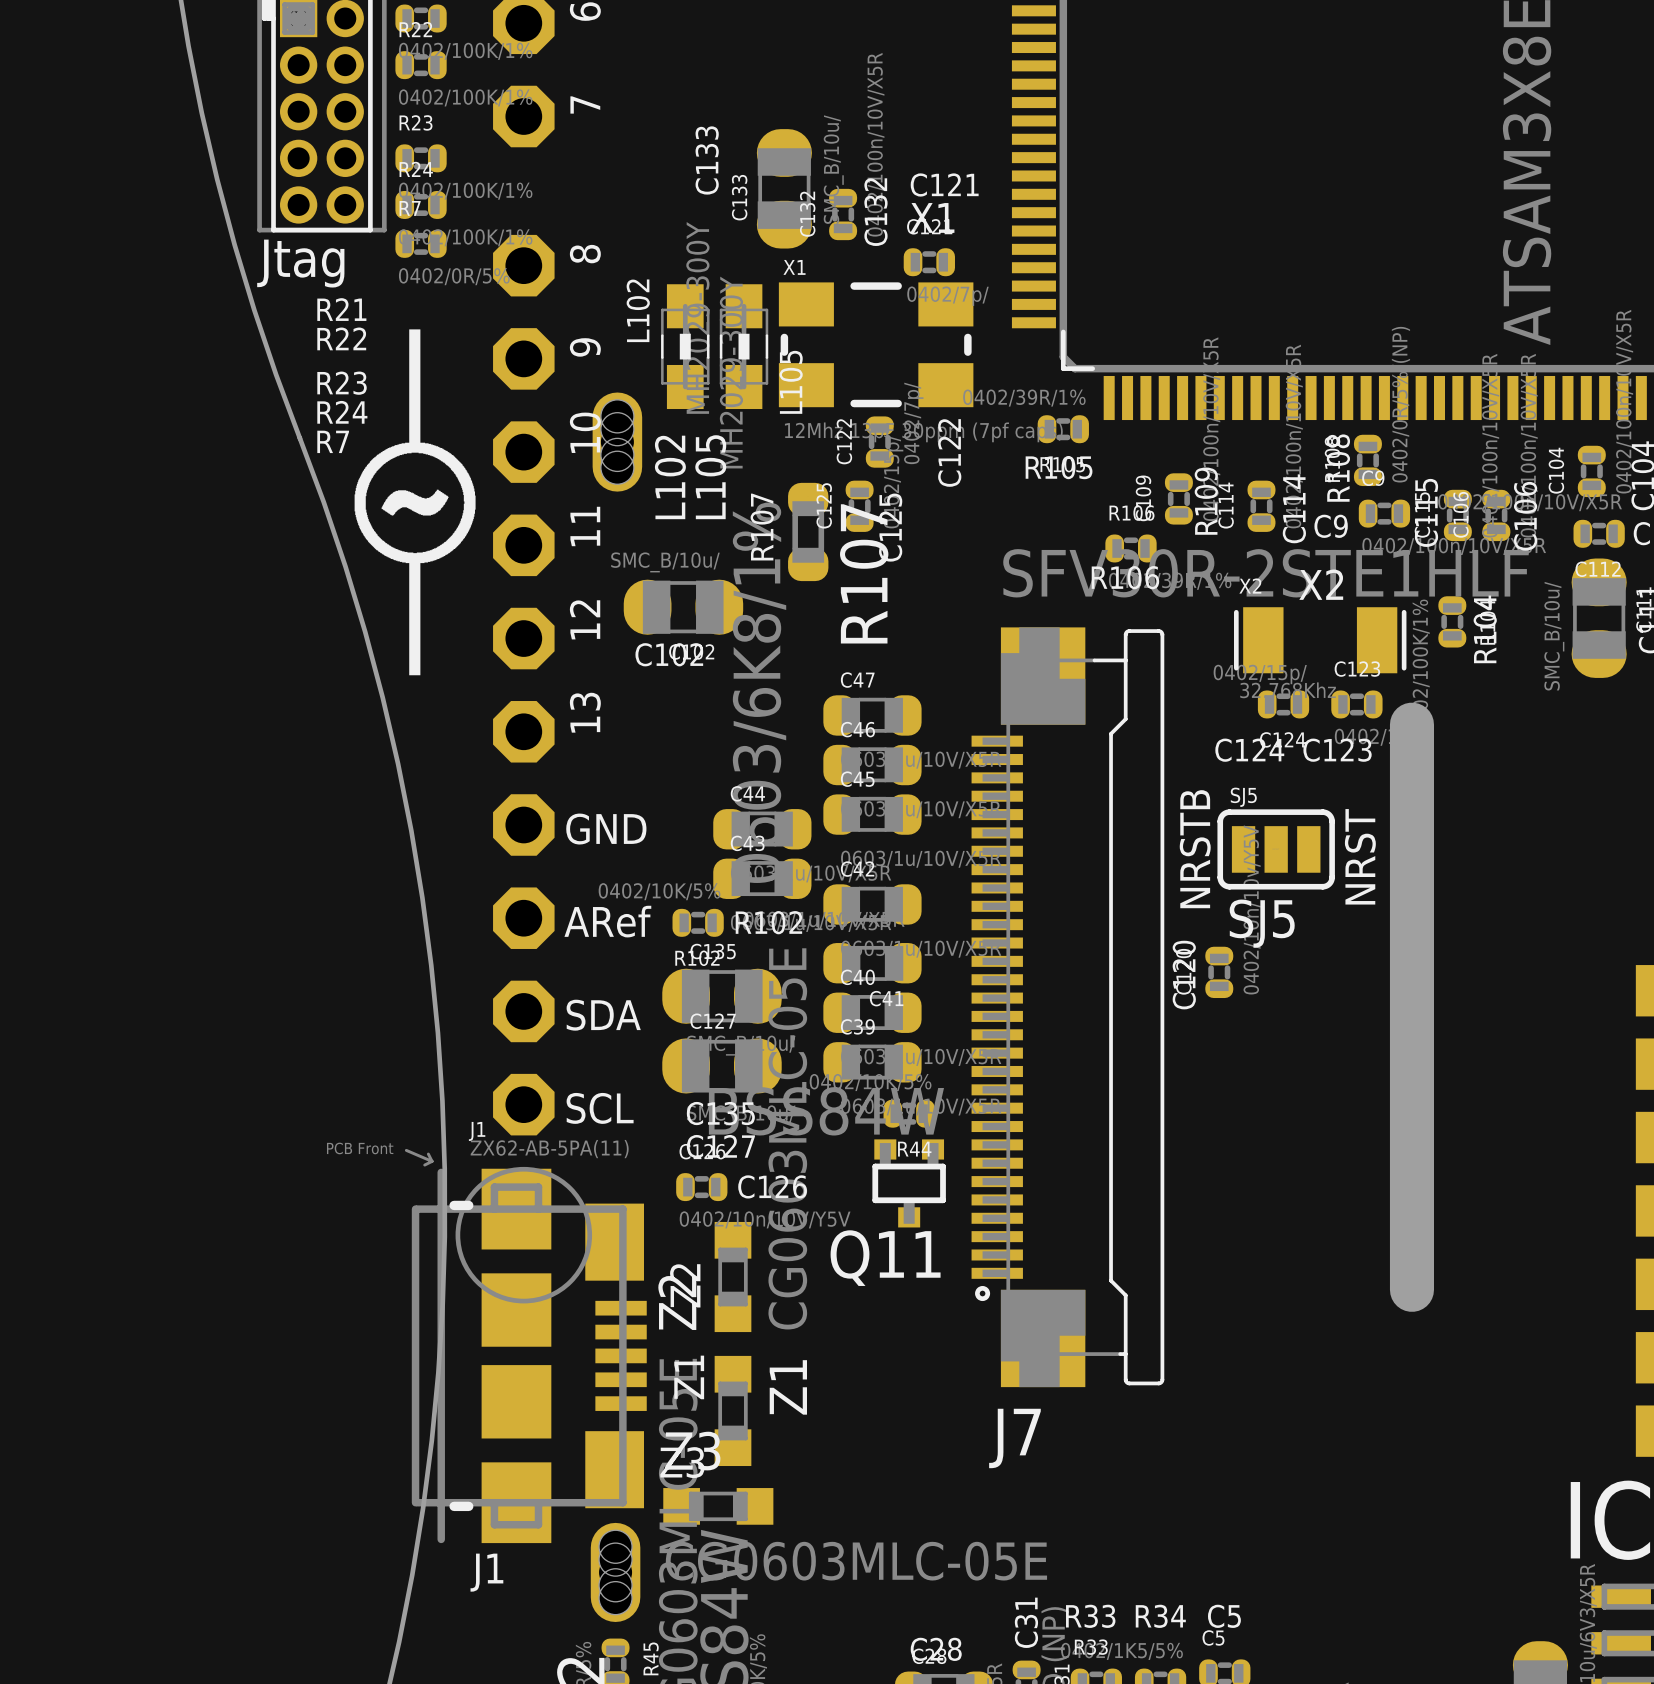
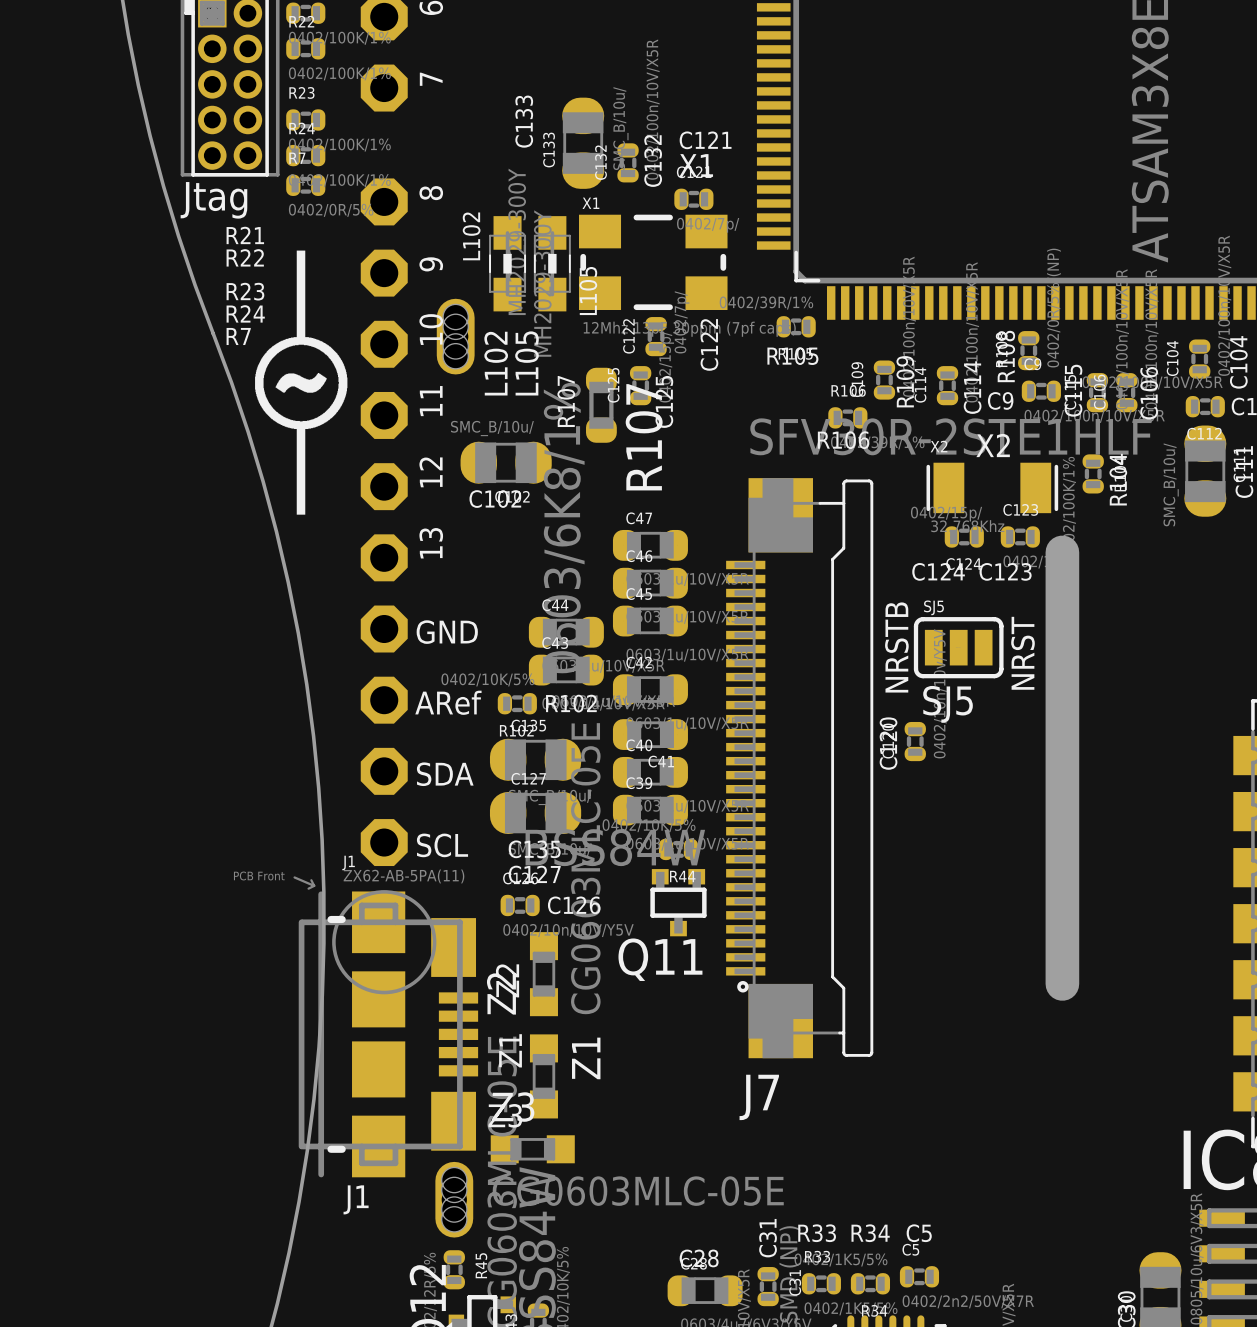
J7 footprint: [971, 627, 1165, 1388] -> [726, 478, 874, 1059]

